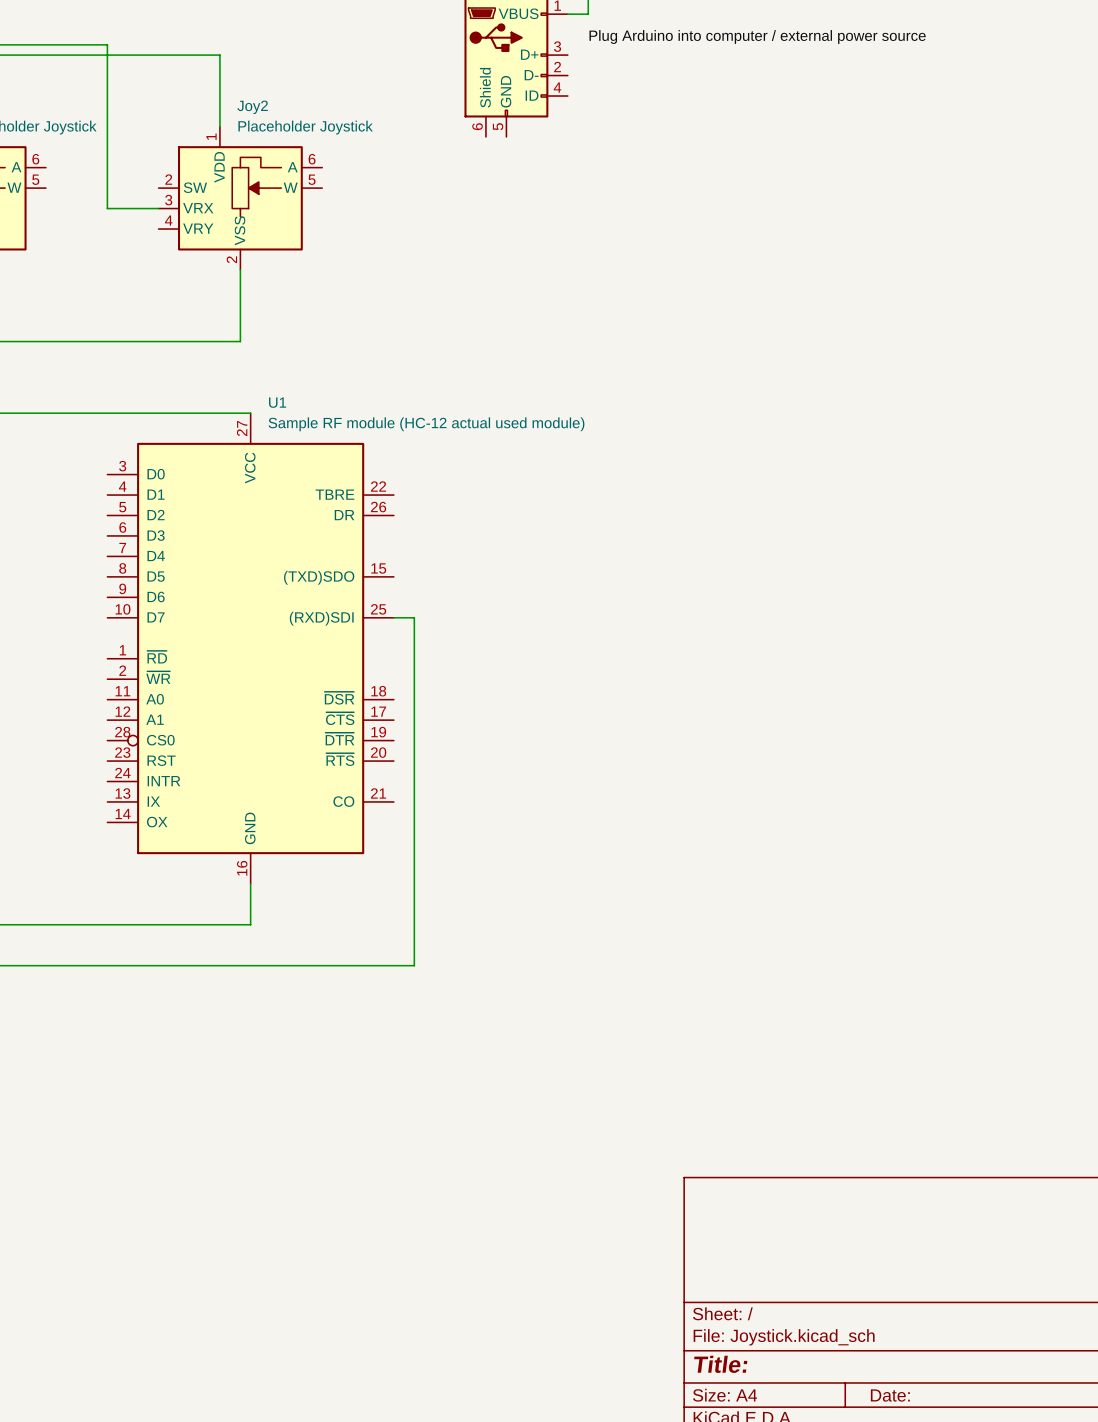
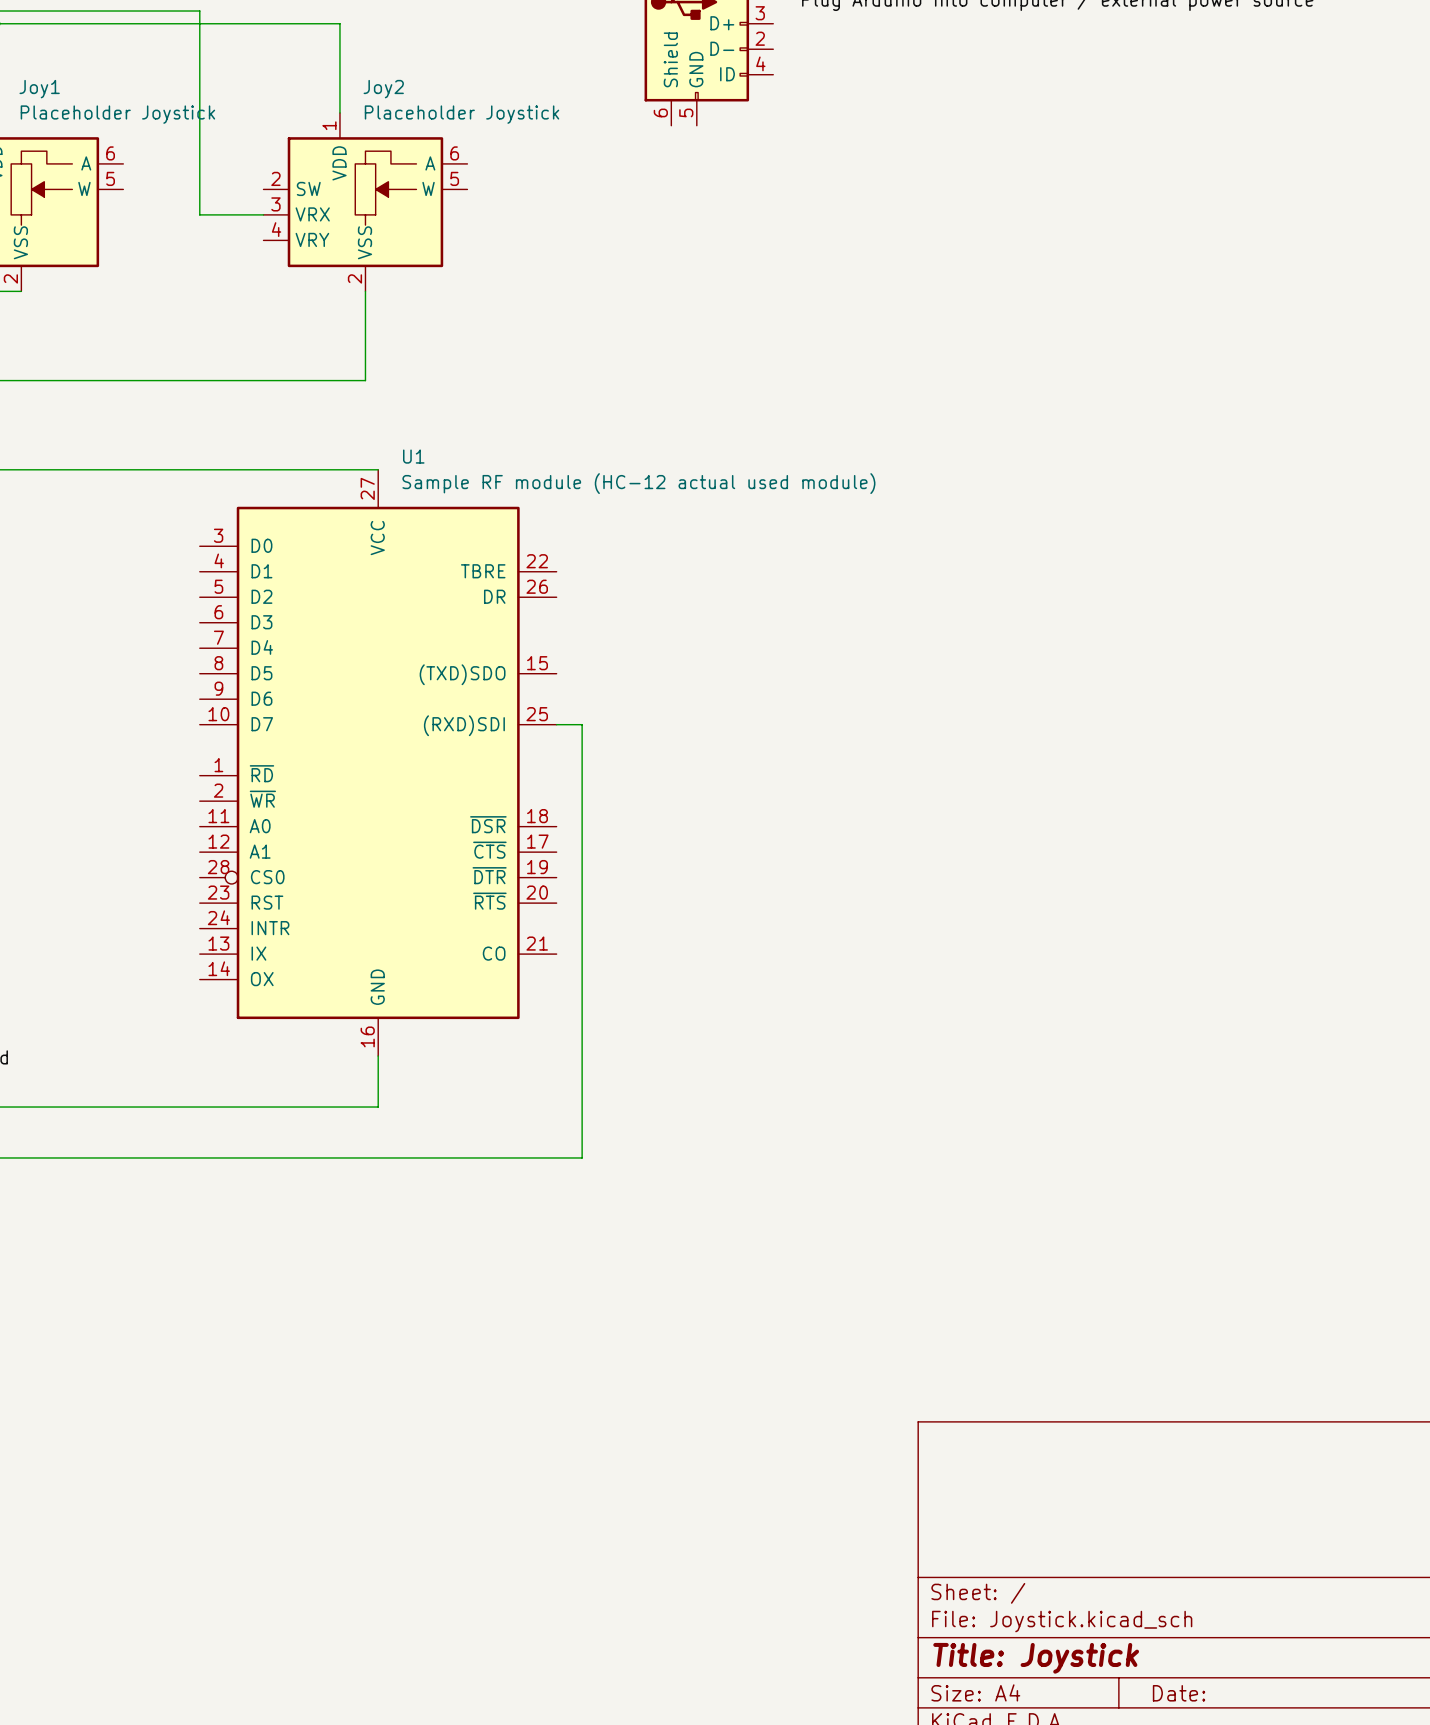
title block: Title: (720, 1364) -> Title: Joystick (1036, 1658)

